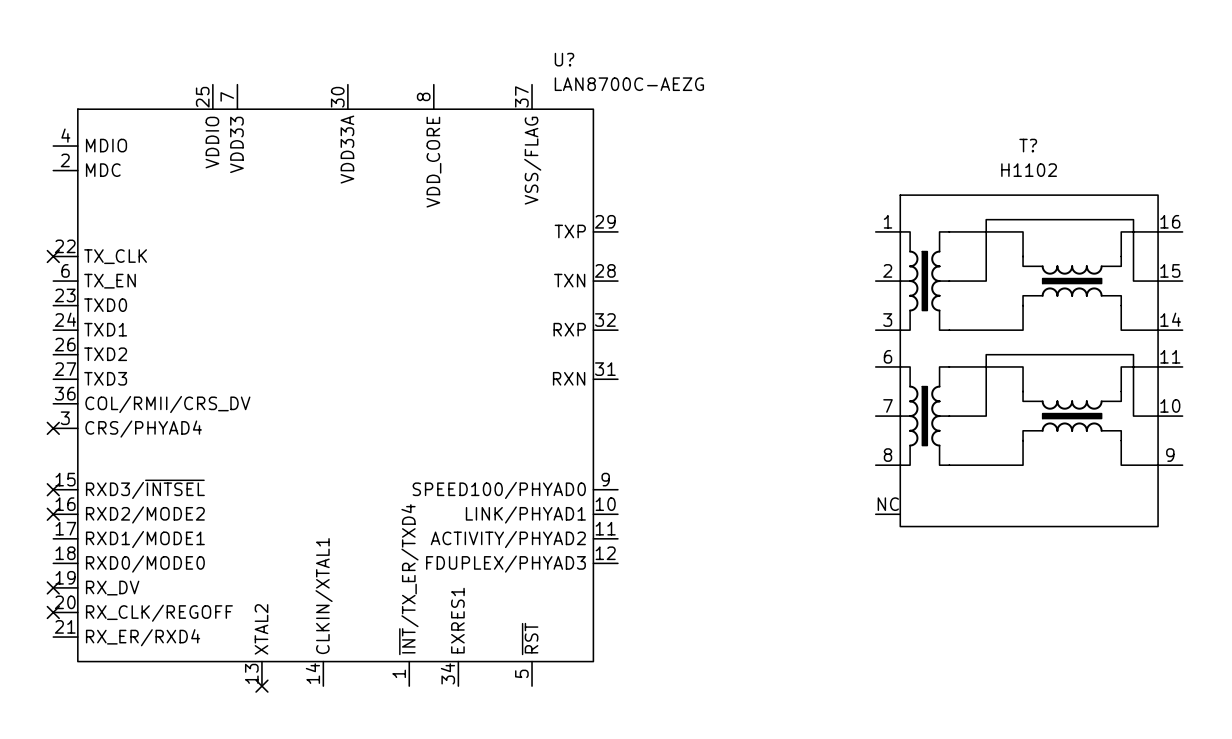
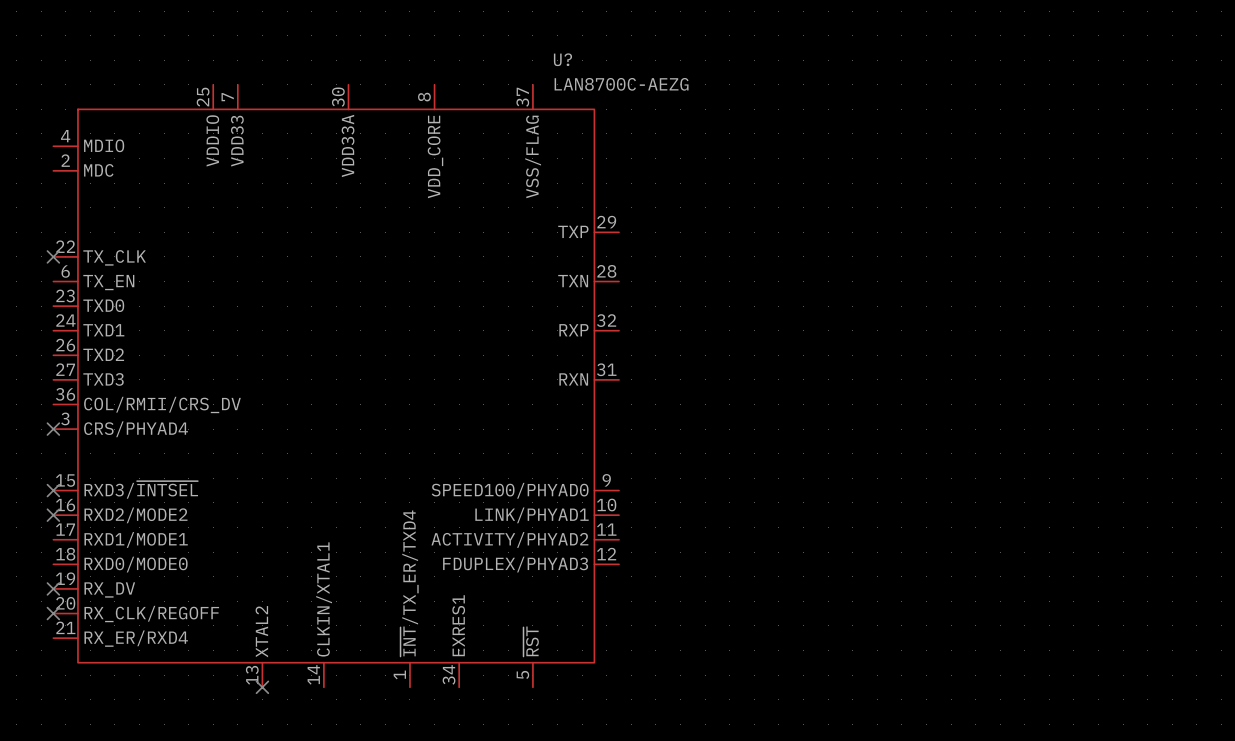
T?: H1102 (1029, 360) -> none

